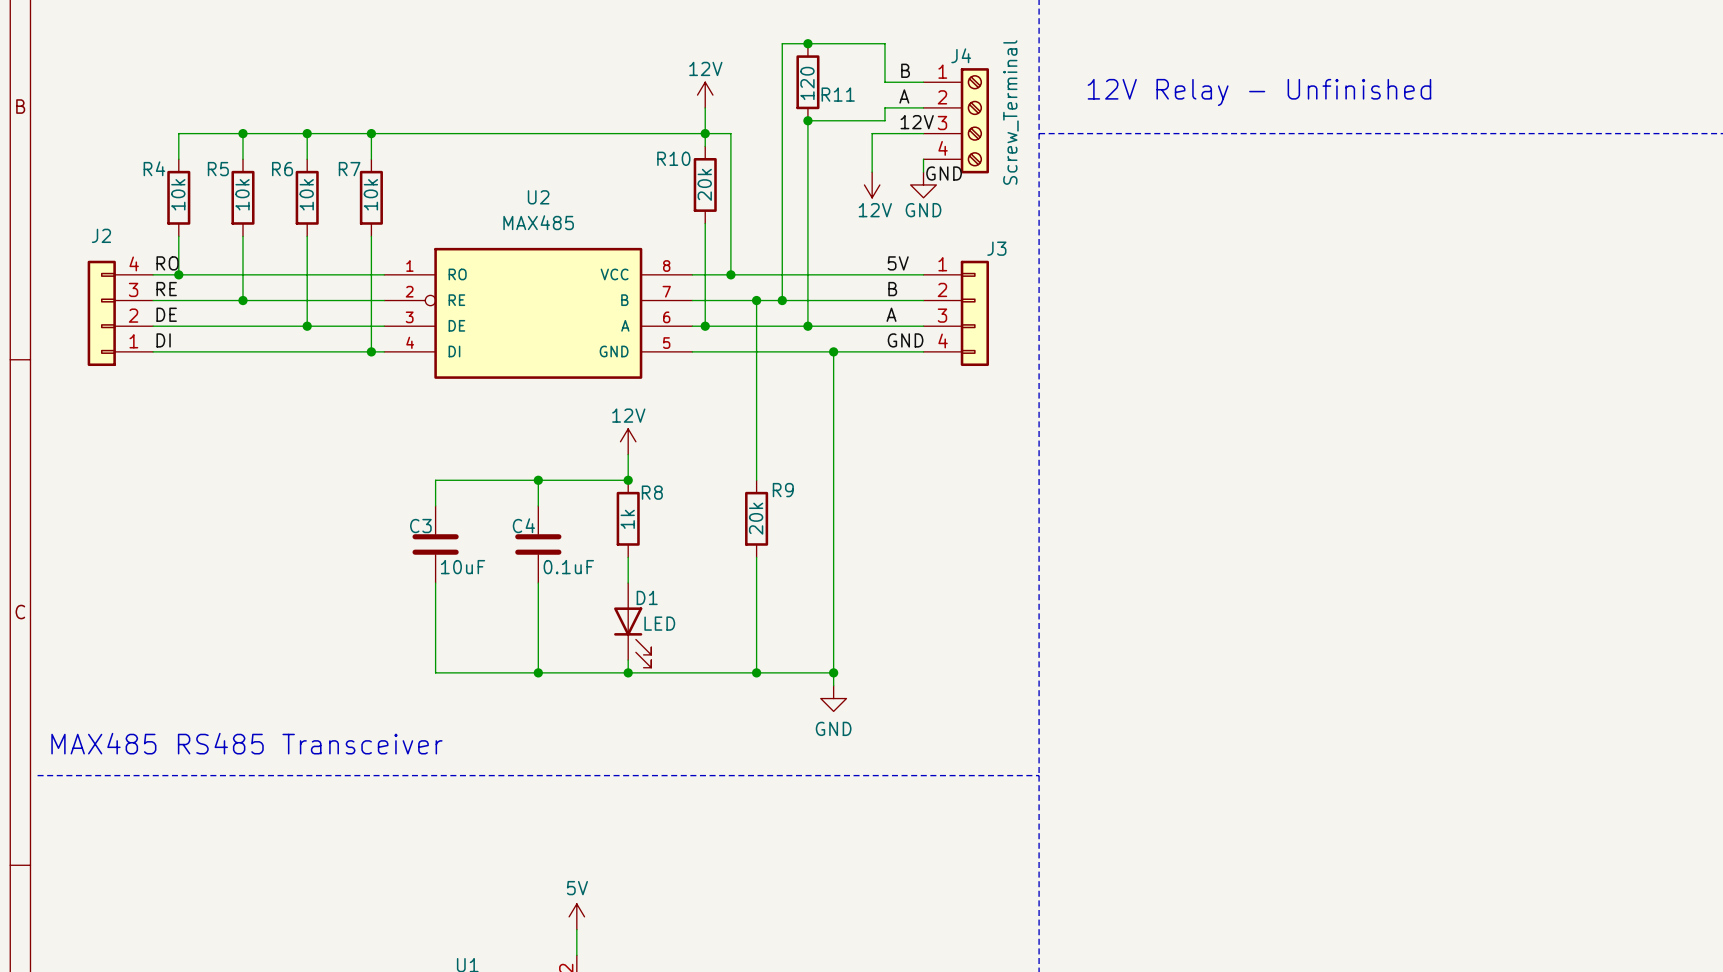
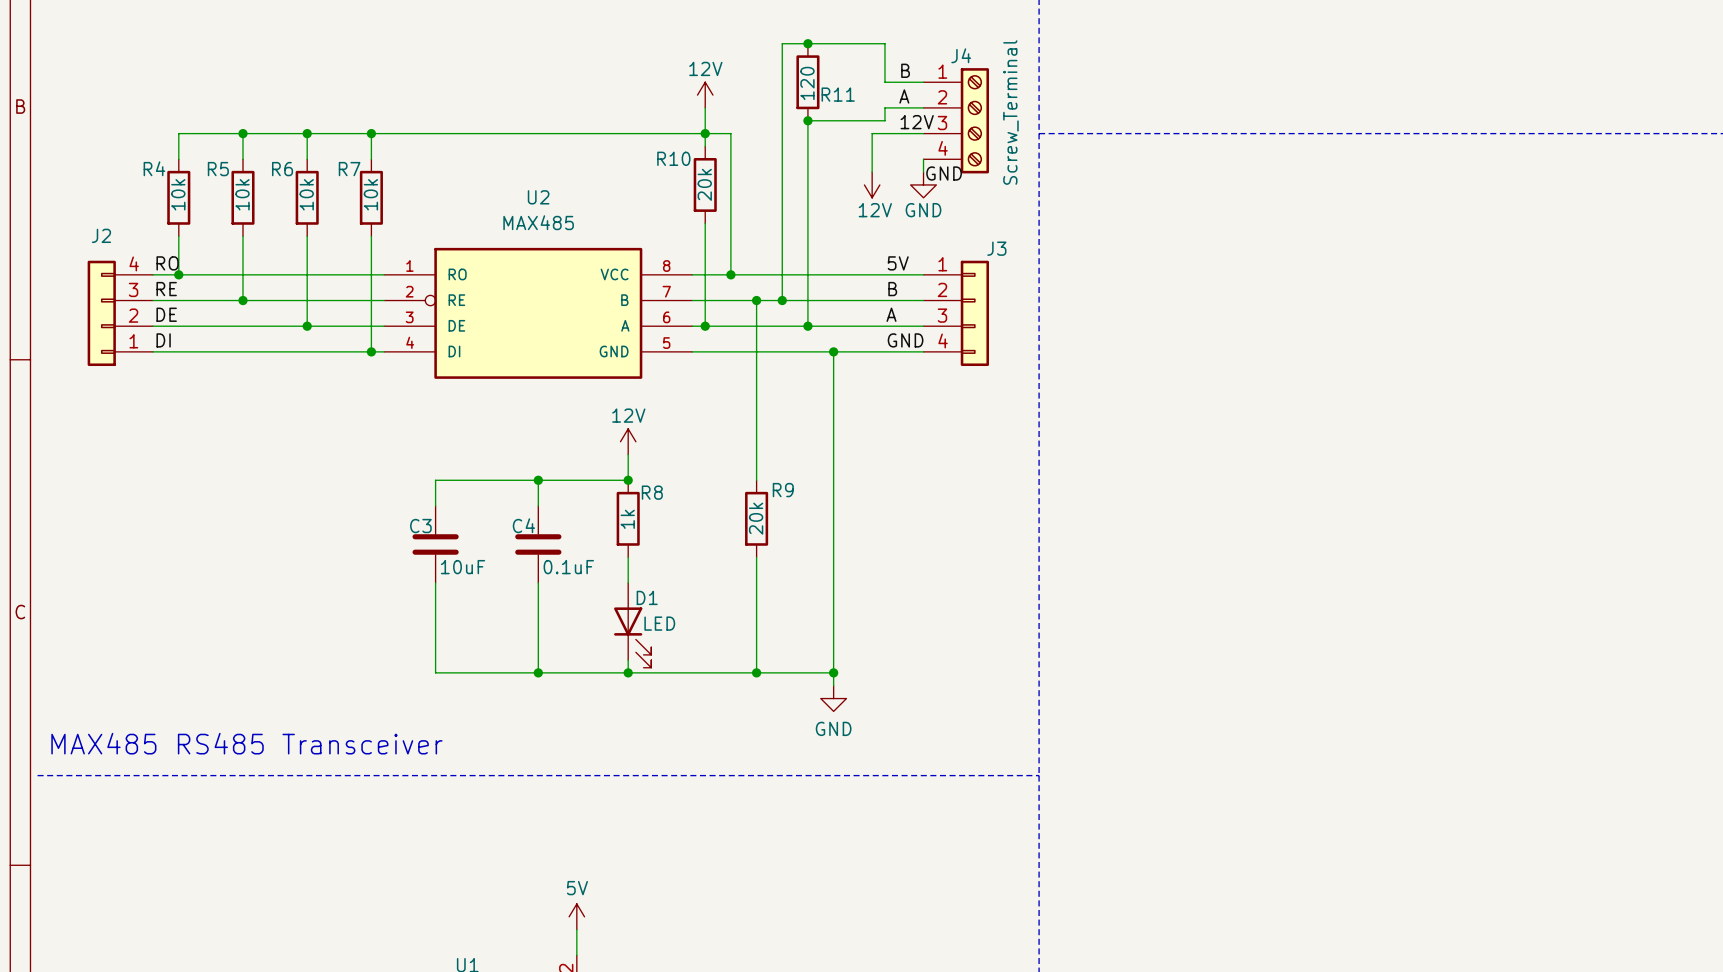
text: 12V Relay - Unfinished (1259, 92) -> none

